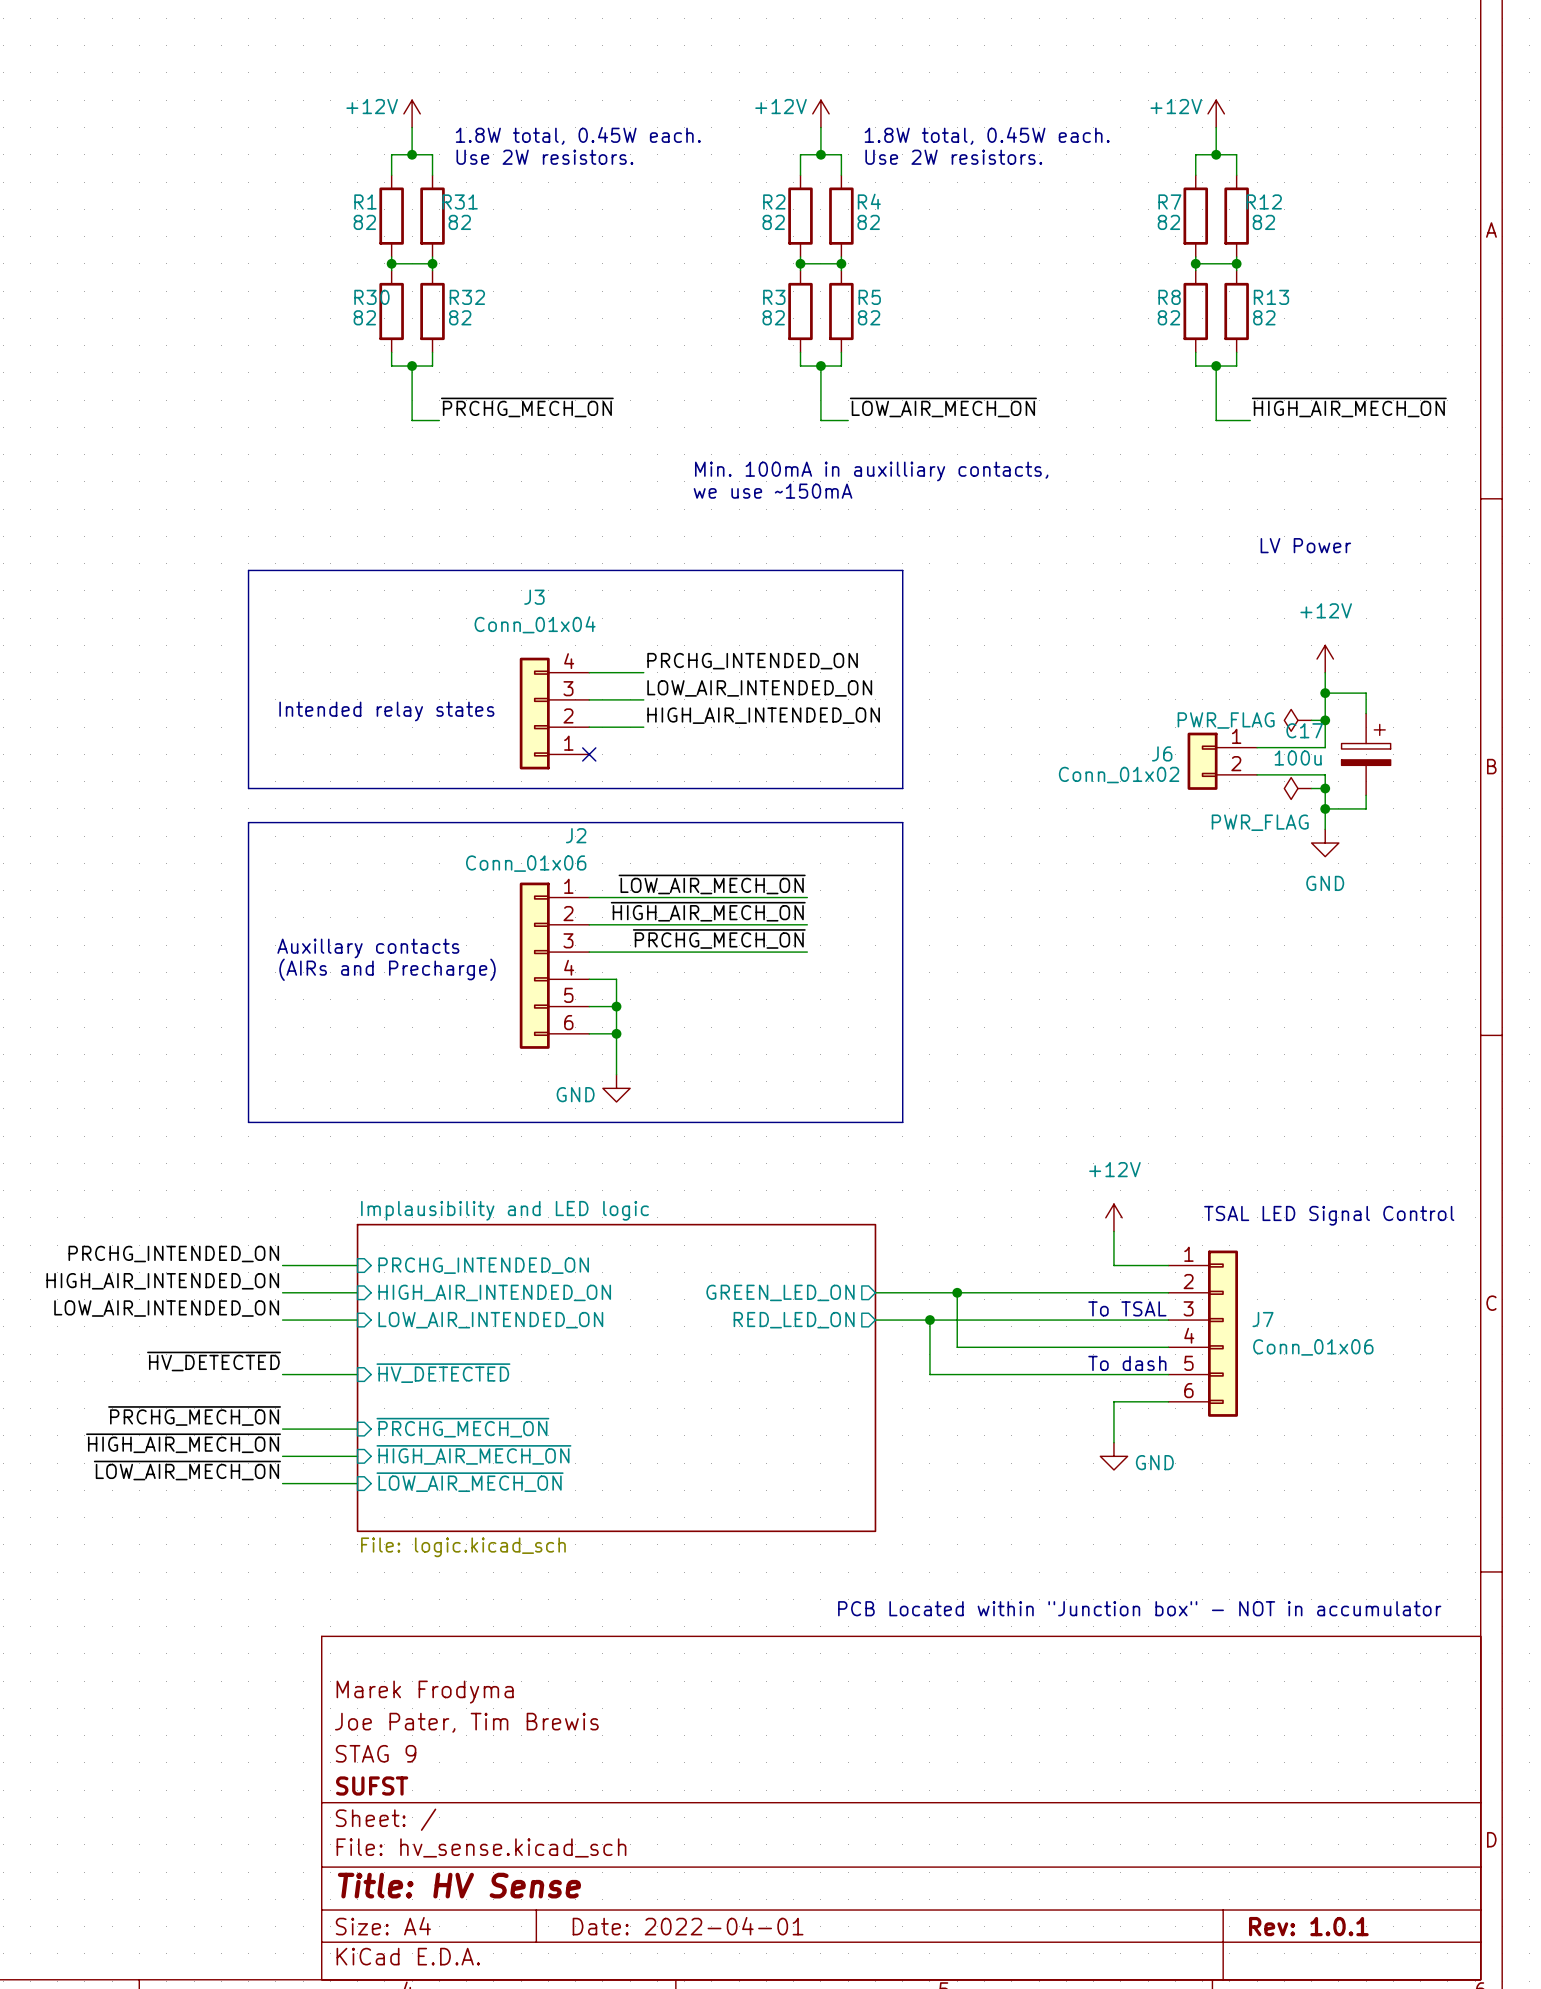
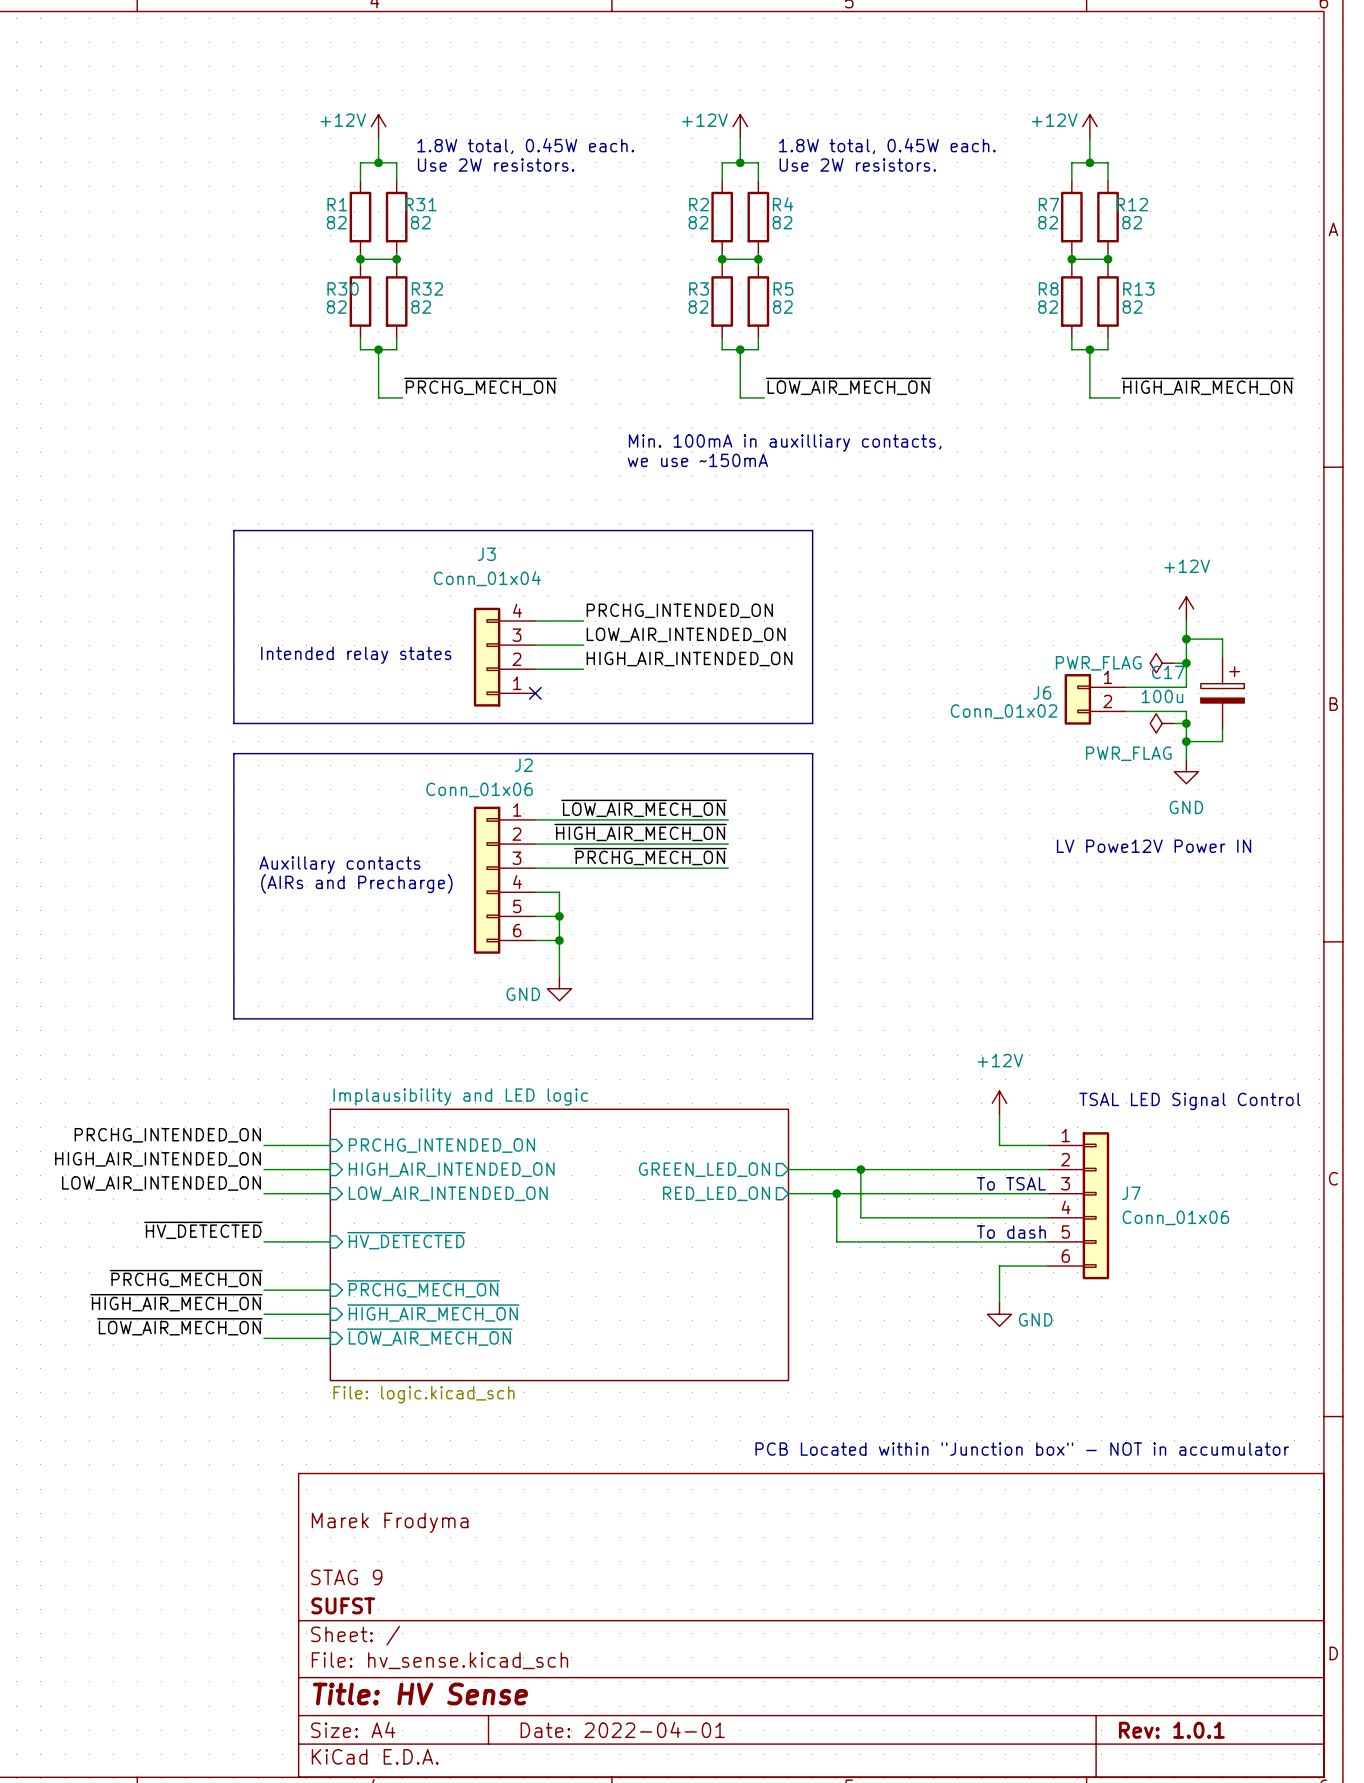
text: LV Power (1305, 545) -> none
text: none -> LV Powe12V Power IN (1154, 846)
title block: Joe Pater, Tim Brewis (466, 1722) -> none

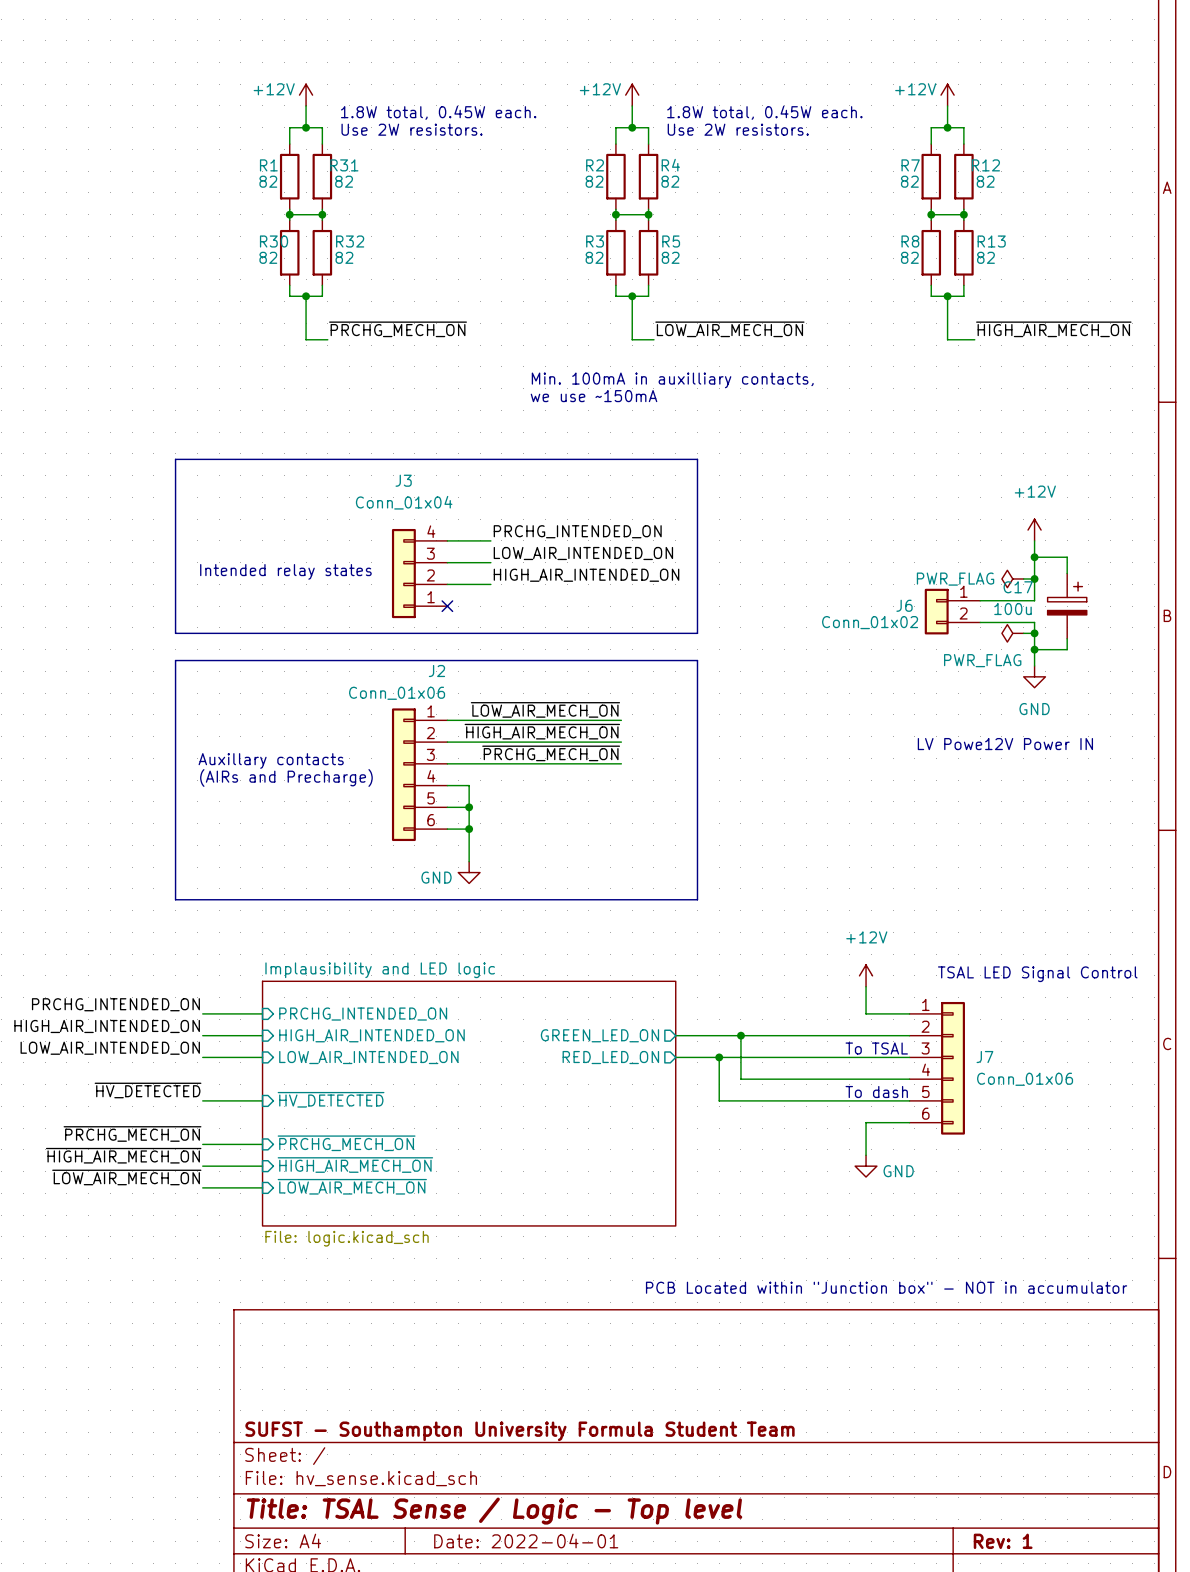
title block: Marek Frodyma (390, 1522) -> none
title block: STAG 9 (346, 1577) -> none
title block: SUFST (343, 1605) -> SUFST - Southampton University Formula Student Team (520, 1431)
title block: Title: HV Sense (420, 1694) -> Title: TSAL Sense / Logic - Top level (494, 1511)
title block: Rev: 1.0.1 (1171, 1730) -> Rev: 1 (1003, 1541)

